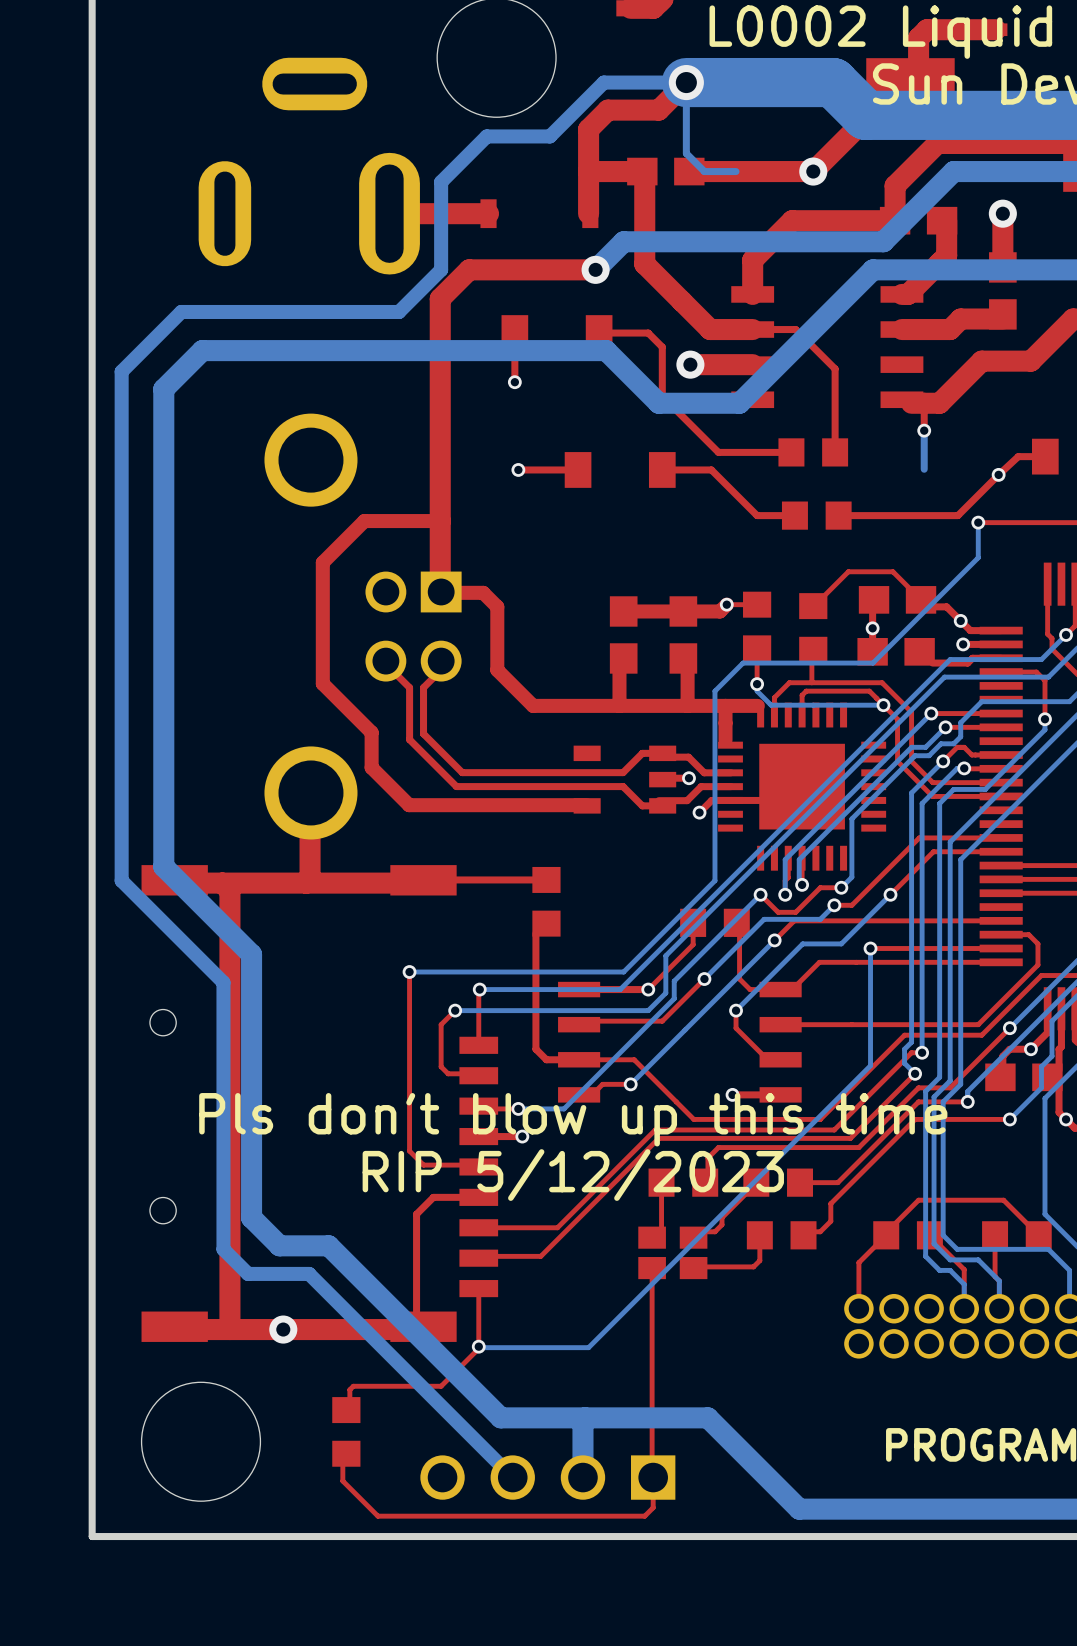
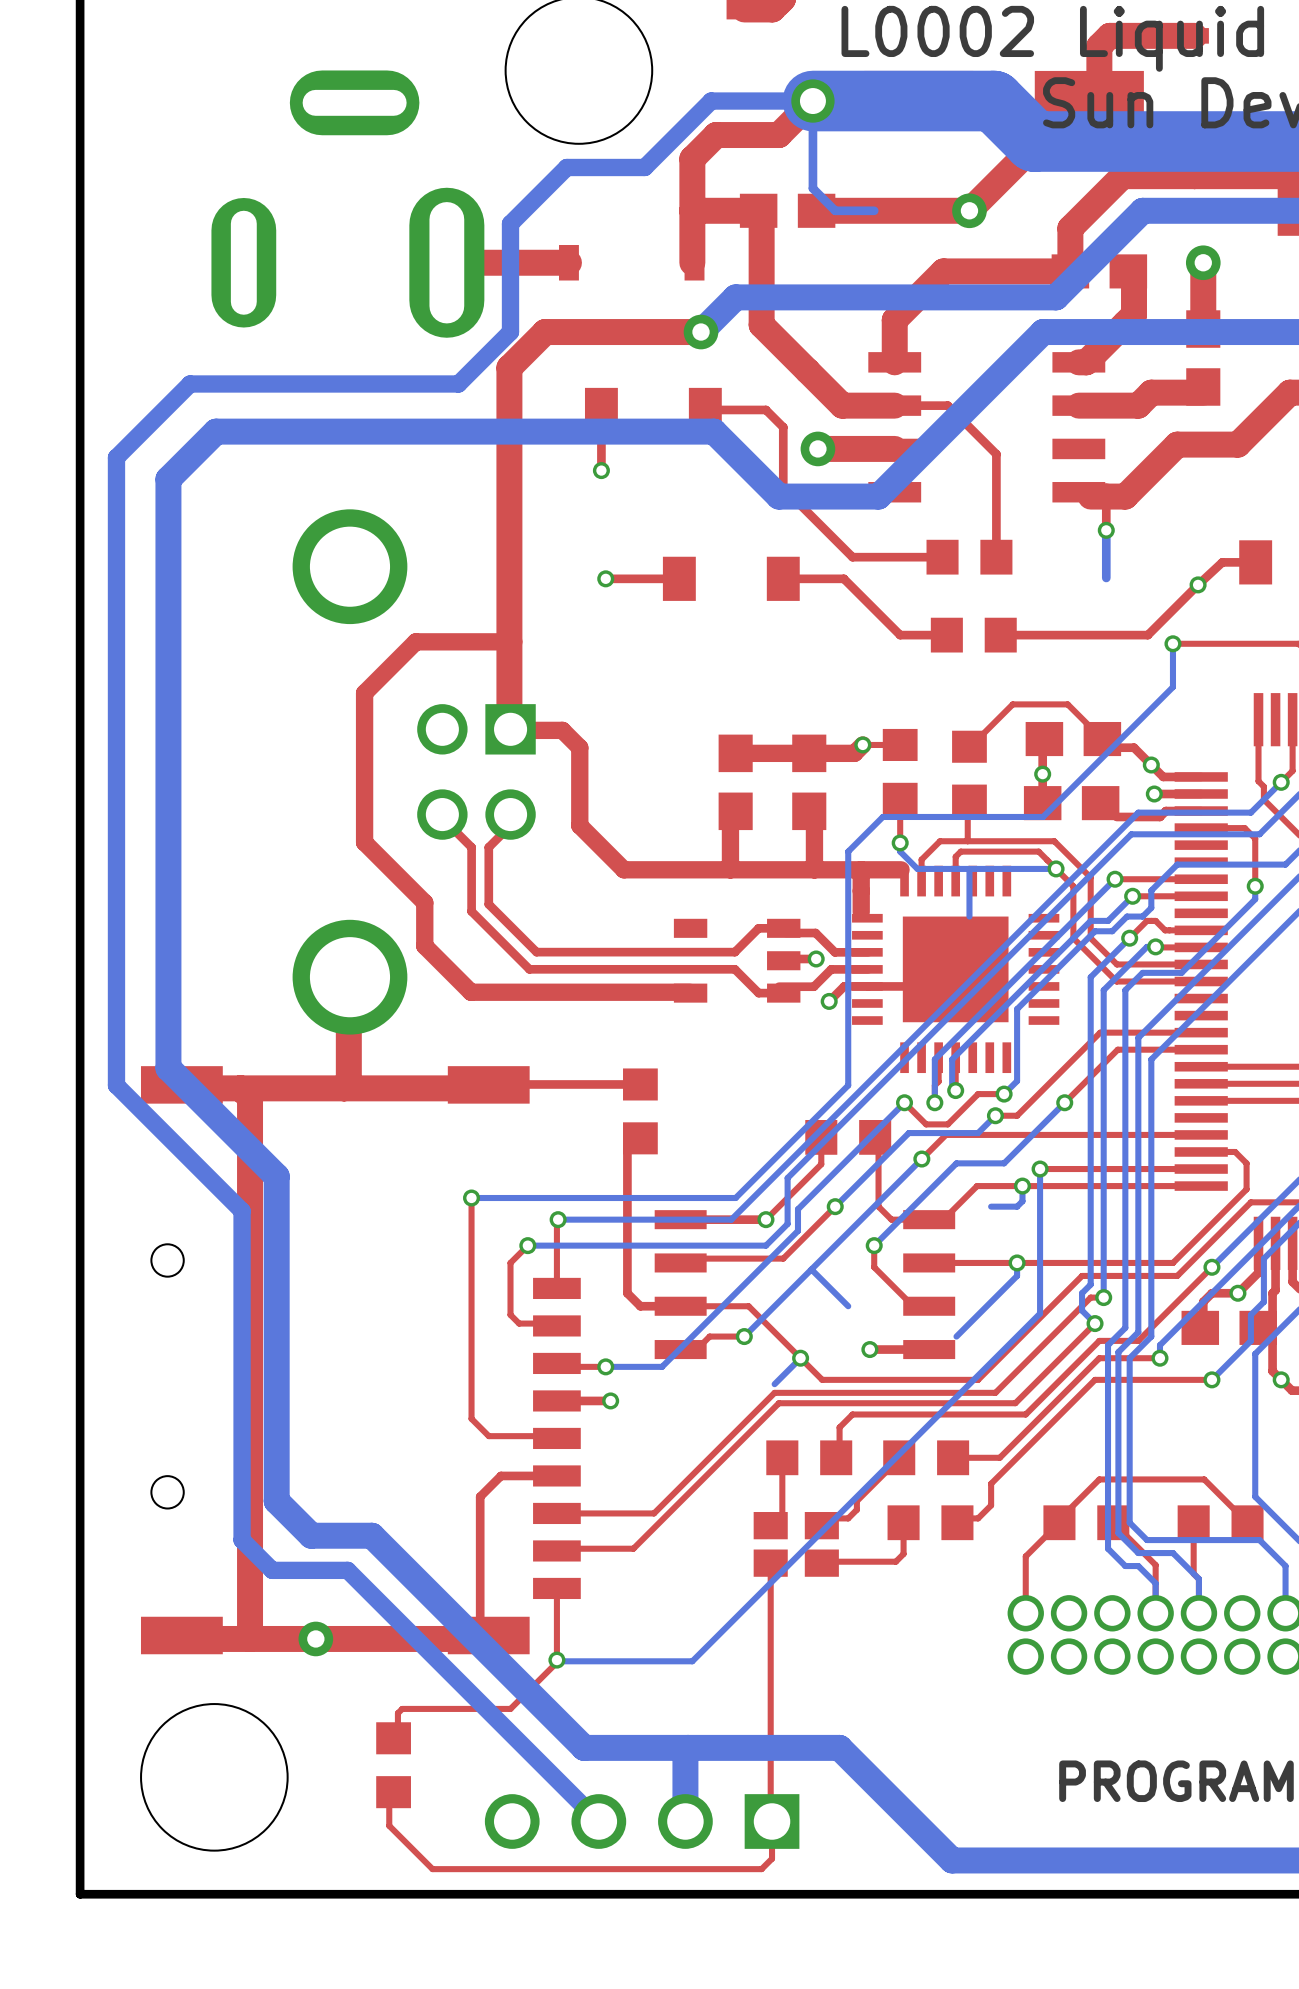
bottom track: none -> (969, 868) (969, 916)
bottom track: none -> (1022, 1186) (1022, 1201) (1017, 1206) (991, 1206)
via: none -> (1022, 1186)
bottom track: none -> (1017, 1262) (1017, 1275) (956, 1336)
via: none -> (1017, 1262)
bottom track: none -> (811, 1269) (848, 1306)
bottom track: none -> (800, 1358) (774, 1384)
via: none -> (800, 1358)
text: Pls don't blow up this time (573, 1119) -> none
text: RIP 5/12/2023 (573, 1175) -> none

